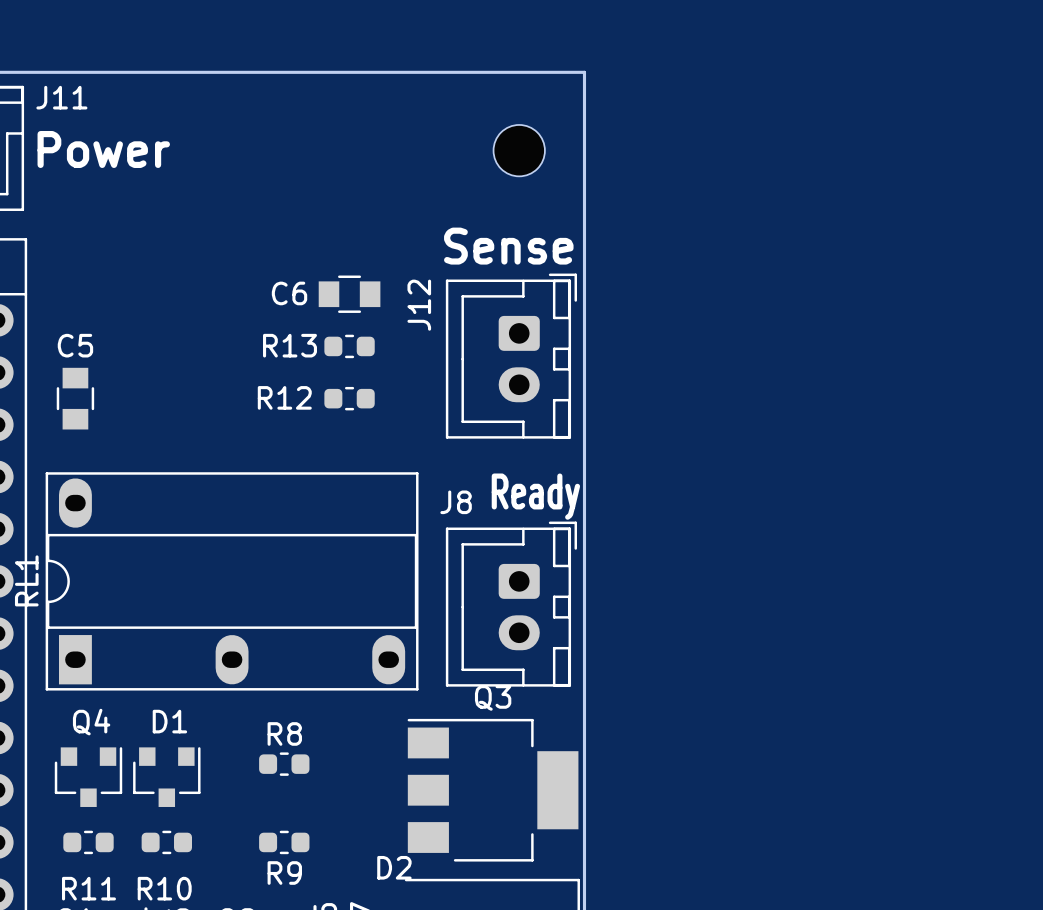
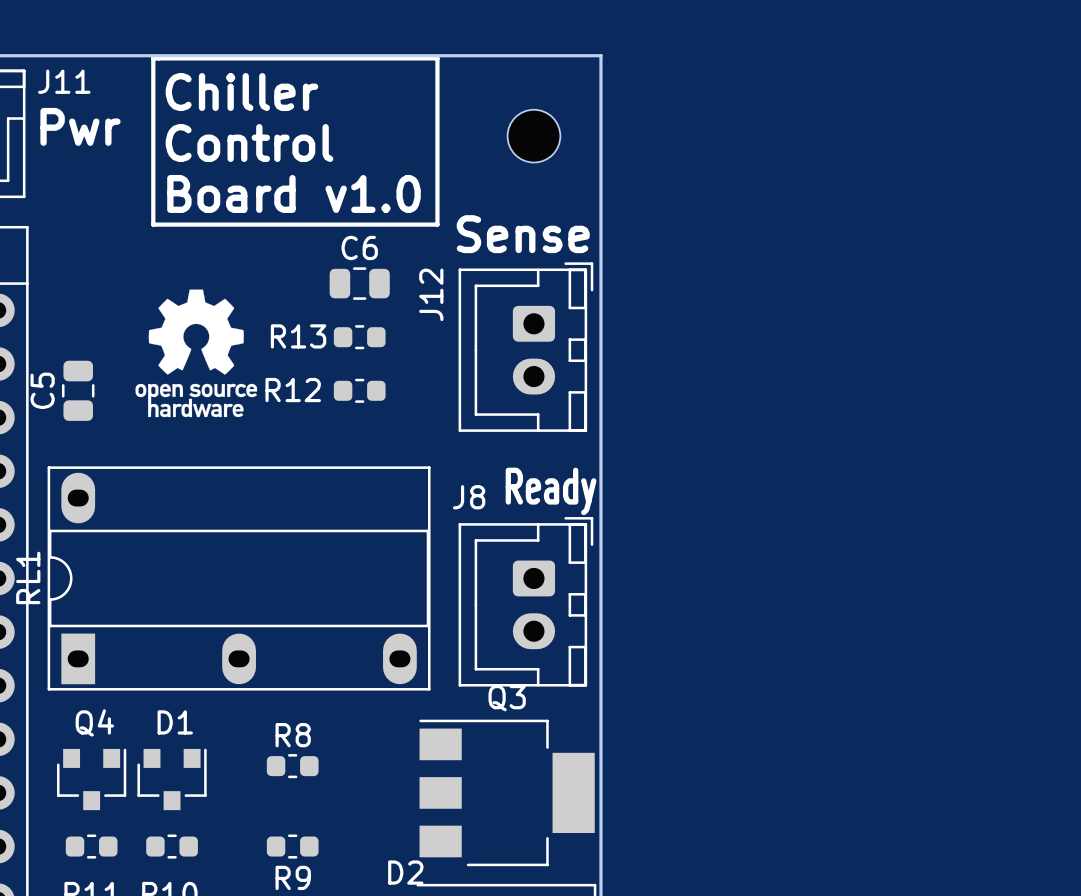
line: none -> (153, 58) (437, 58) (437, 224) (153, 224) (153, 58)
text: none -> Chiller (241, 92)
text: Power (103, 149) -> Pwr (80, 126)
text: none -> Control (249, 143)
text: none -> Board v1.0 (293, 193)
C6 footprint: [318, 275, 381, 313] -> [329, 267, 390, 300]
C6 name position: C6 (289, 293) -> C6 (359, 247)
drawing: none -> [135, 289, 258, 418]
C5 name rotation: 0° (75, 345) -> 90° counterclockwise (42, 390)
C5 name position: C5 (75, 345) -> C5 (42, 390)
C5 footprint: [56, 367, 95, 430] -> [61, 360, 95, 421]

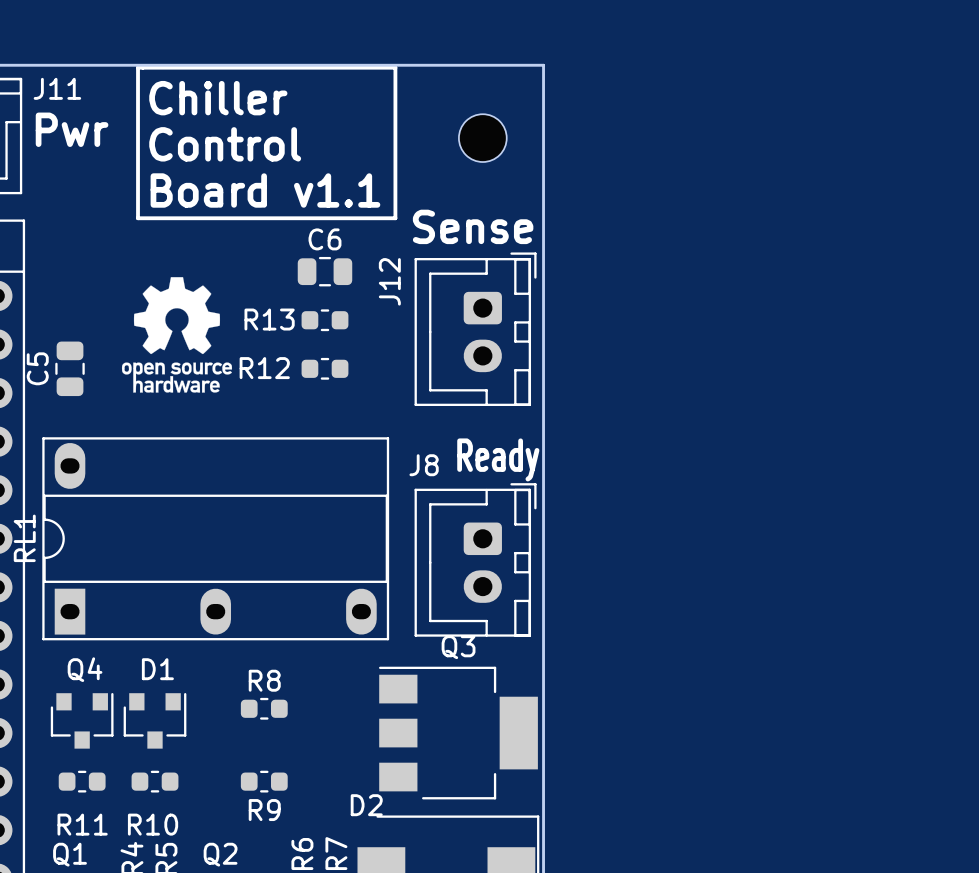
text: Board v1.0 (293, 193) -> Board v1.1 (265, 190)

